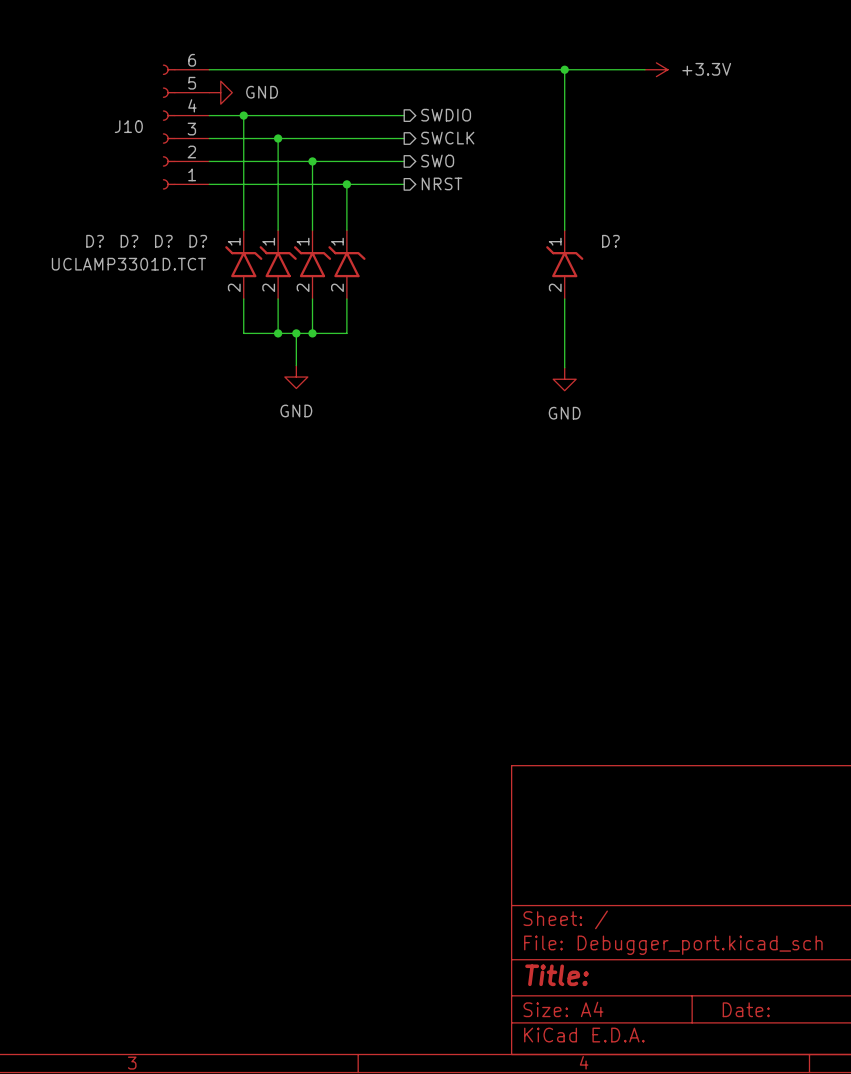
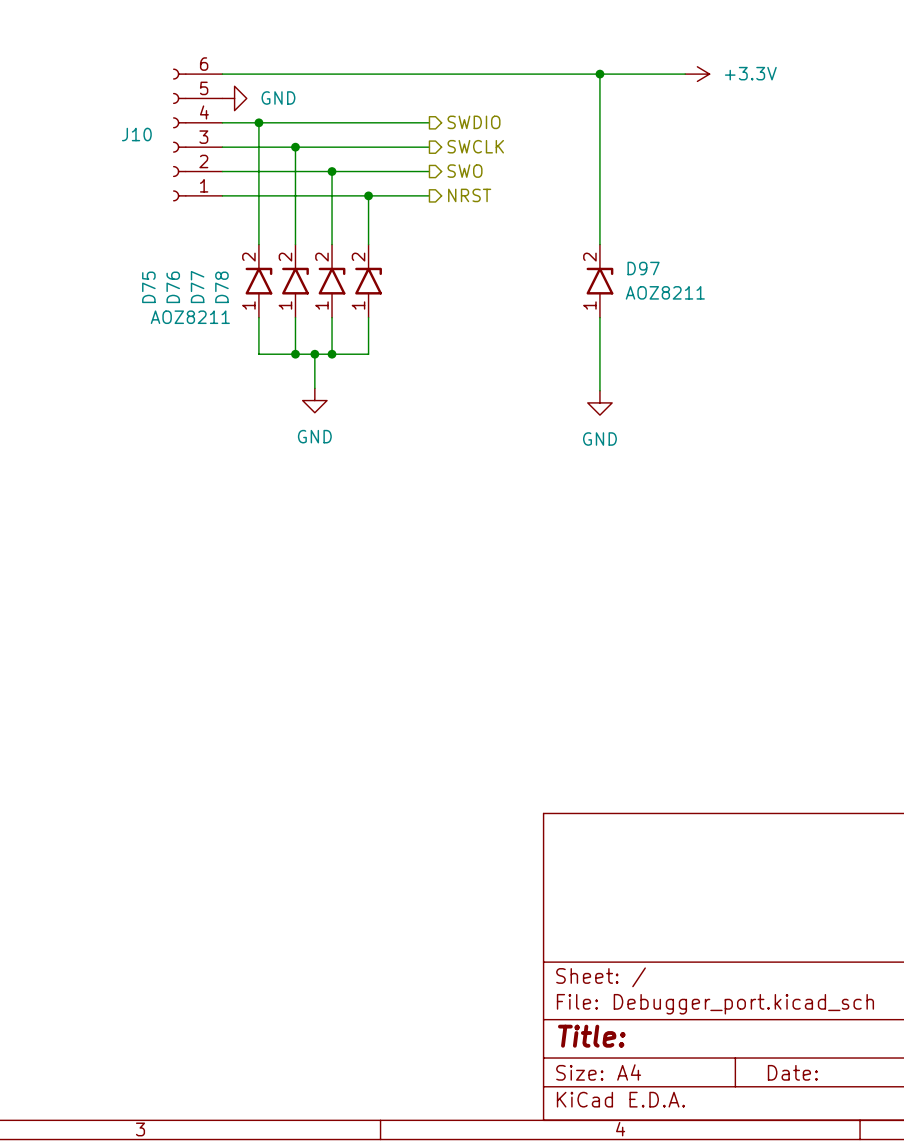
D?: UCLAMP3301D.TCT (243, 264) -> none
D75: none -> AOZ8211 (258, 281)
D?: (278, 264) -> none
D76: none -> (295, 281)
D?: (312, 264) -> none
D77: none -> (332, 281)
D?: (346, 264) -> none
D78: none -> (368, 281)
D?: (564, 264) -> none
D97: none -> AOZ8211 (599, 281)

